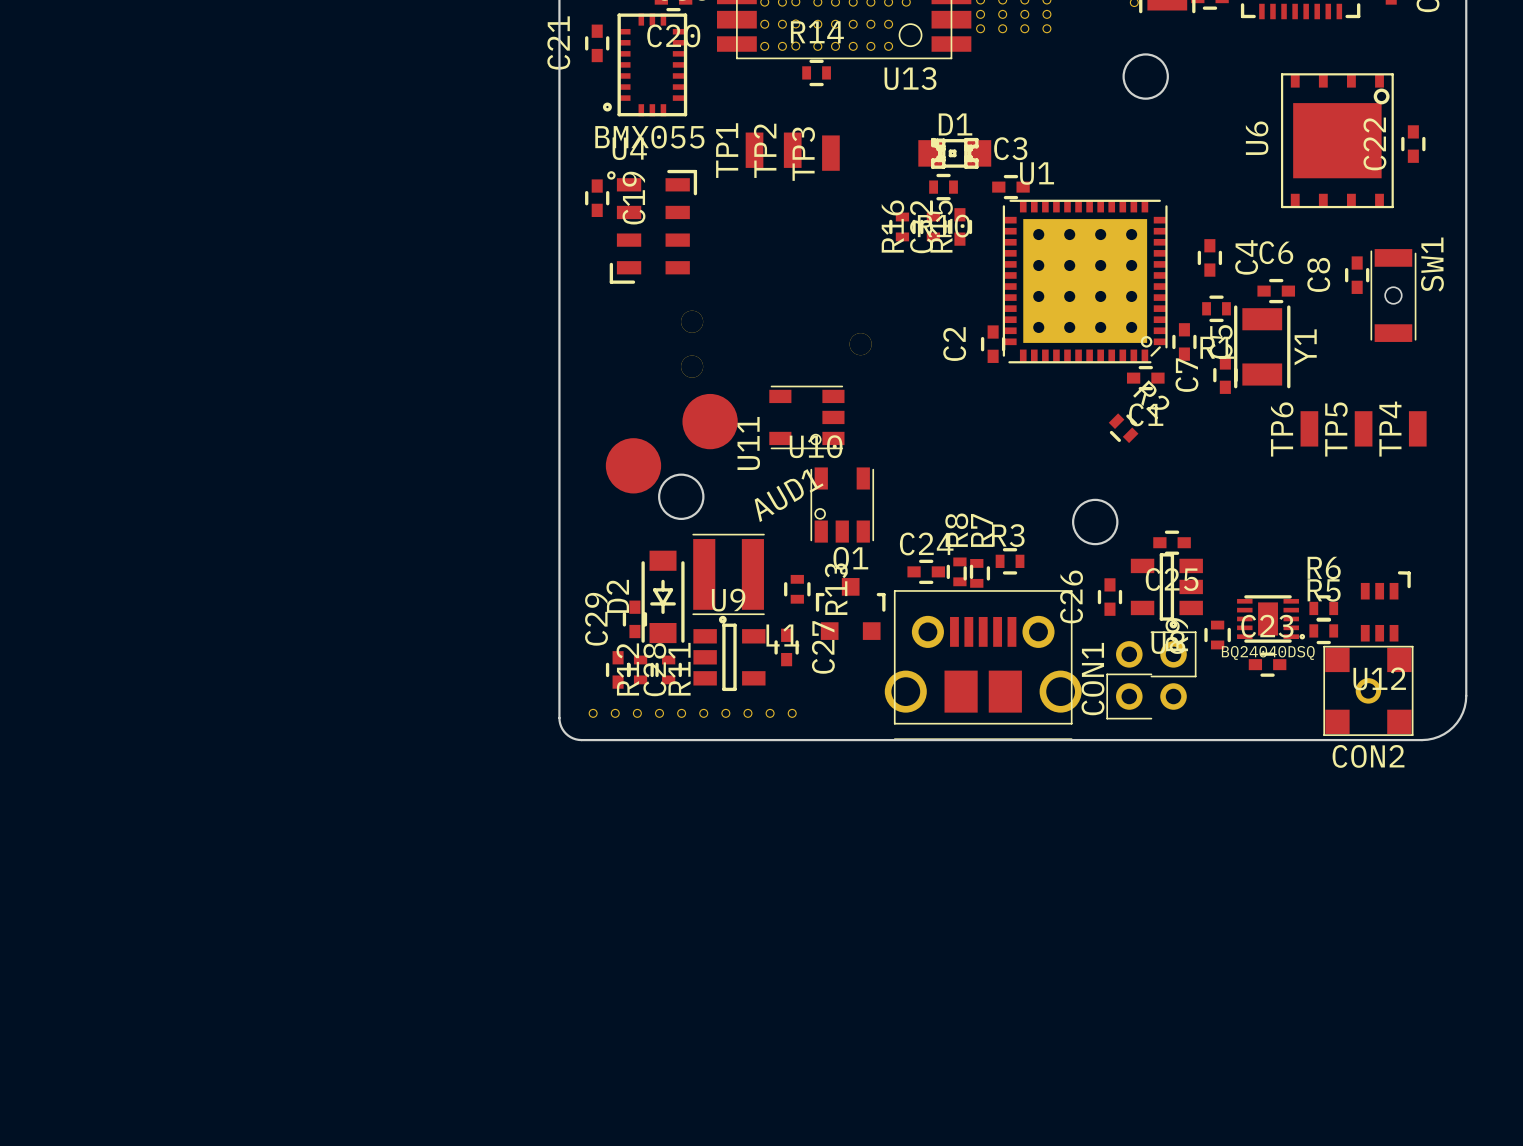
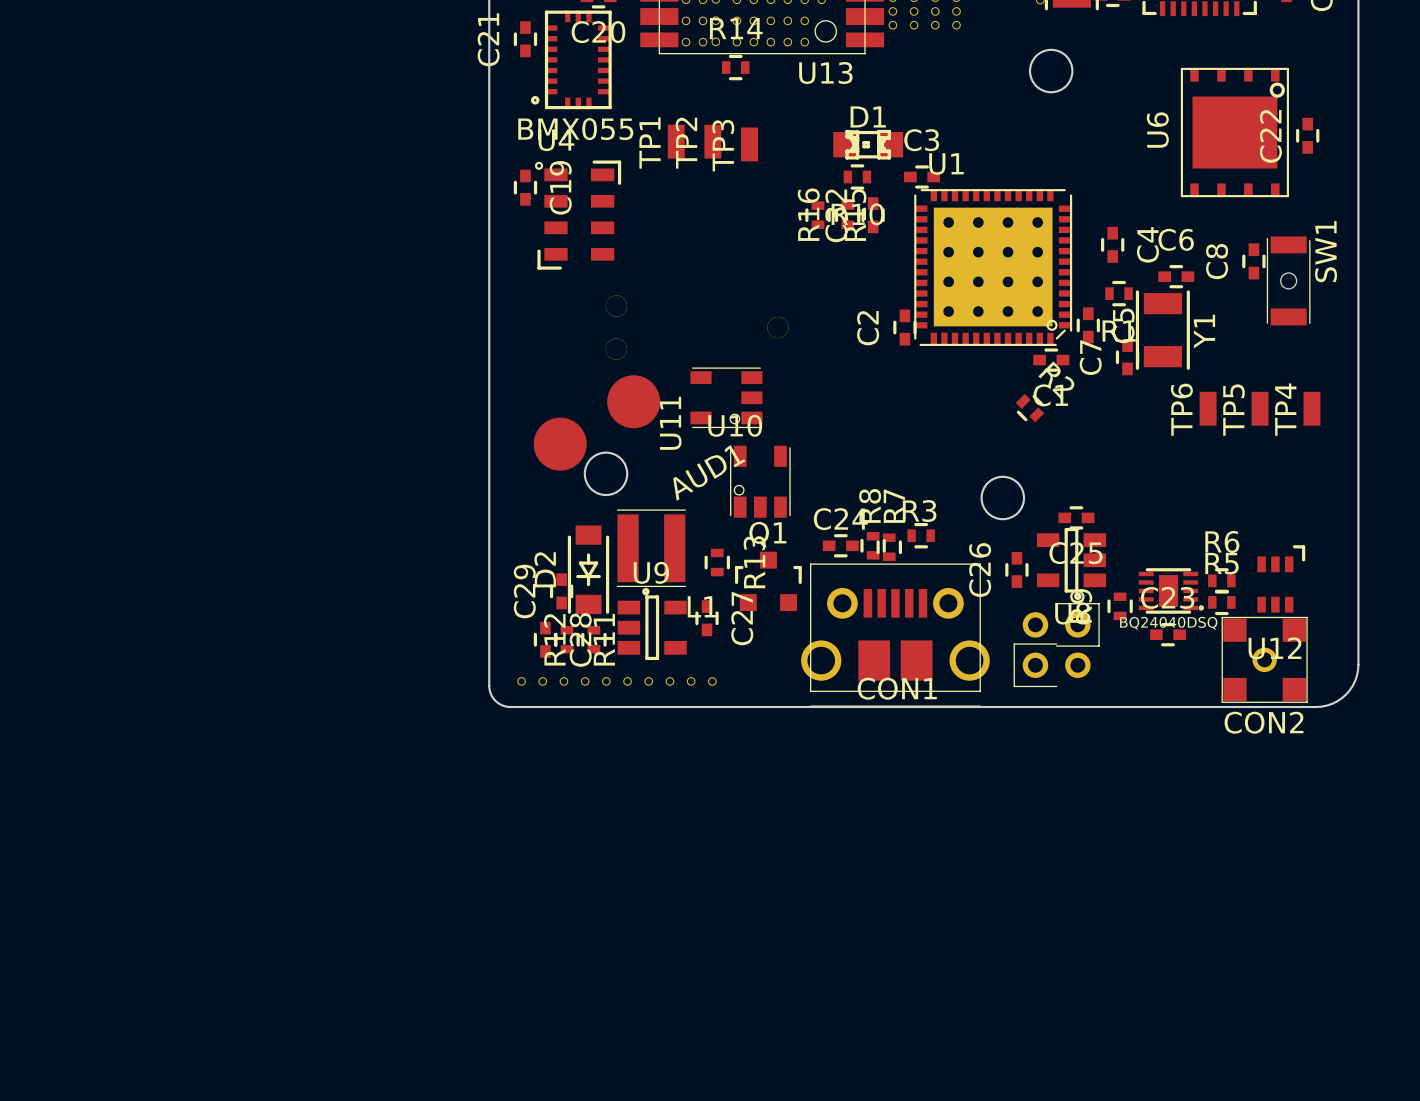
CON1 name rotation: 0° (1092, 679) -> 90° clockwise (897, 688)
CON1 name position: CON1 (1092, 679) -> CON1 (897, 688)

